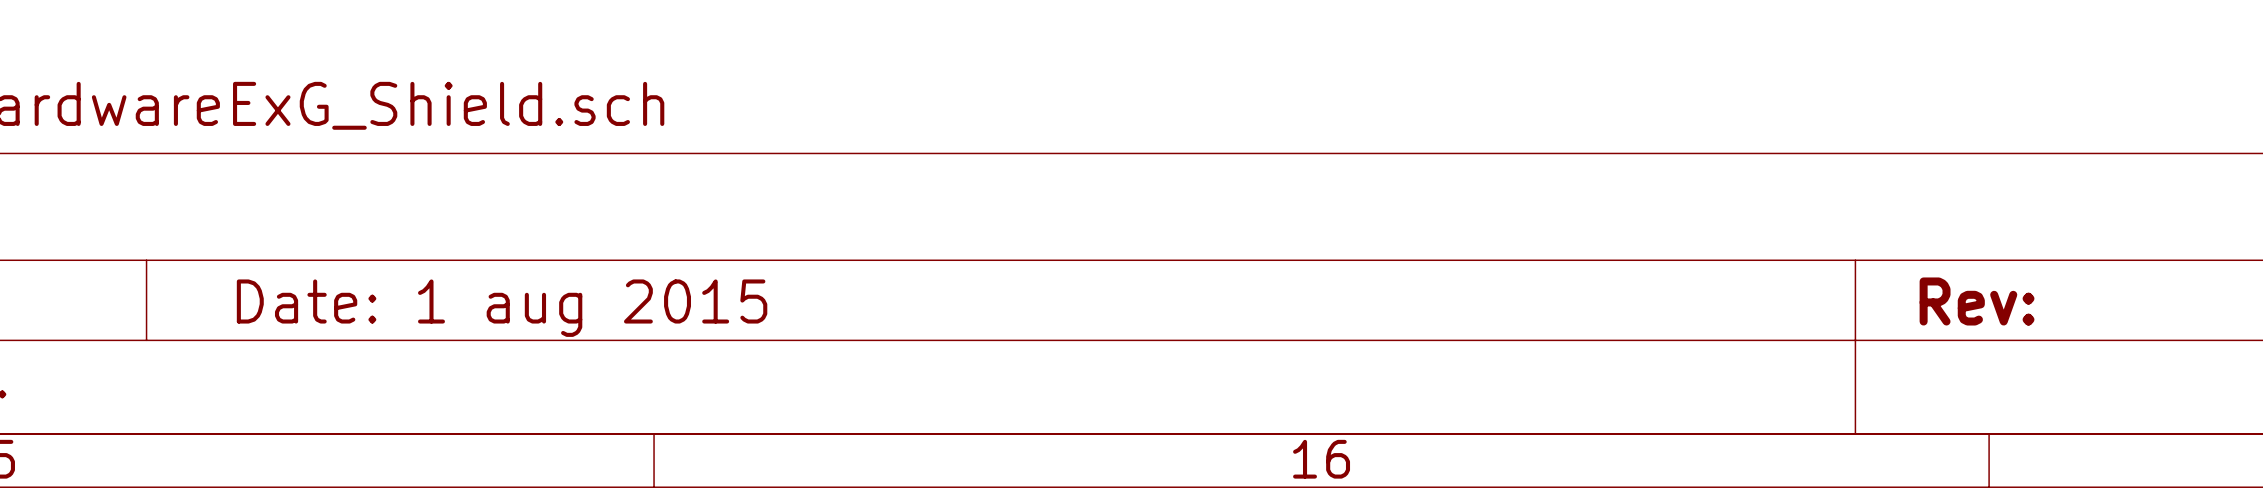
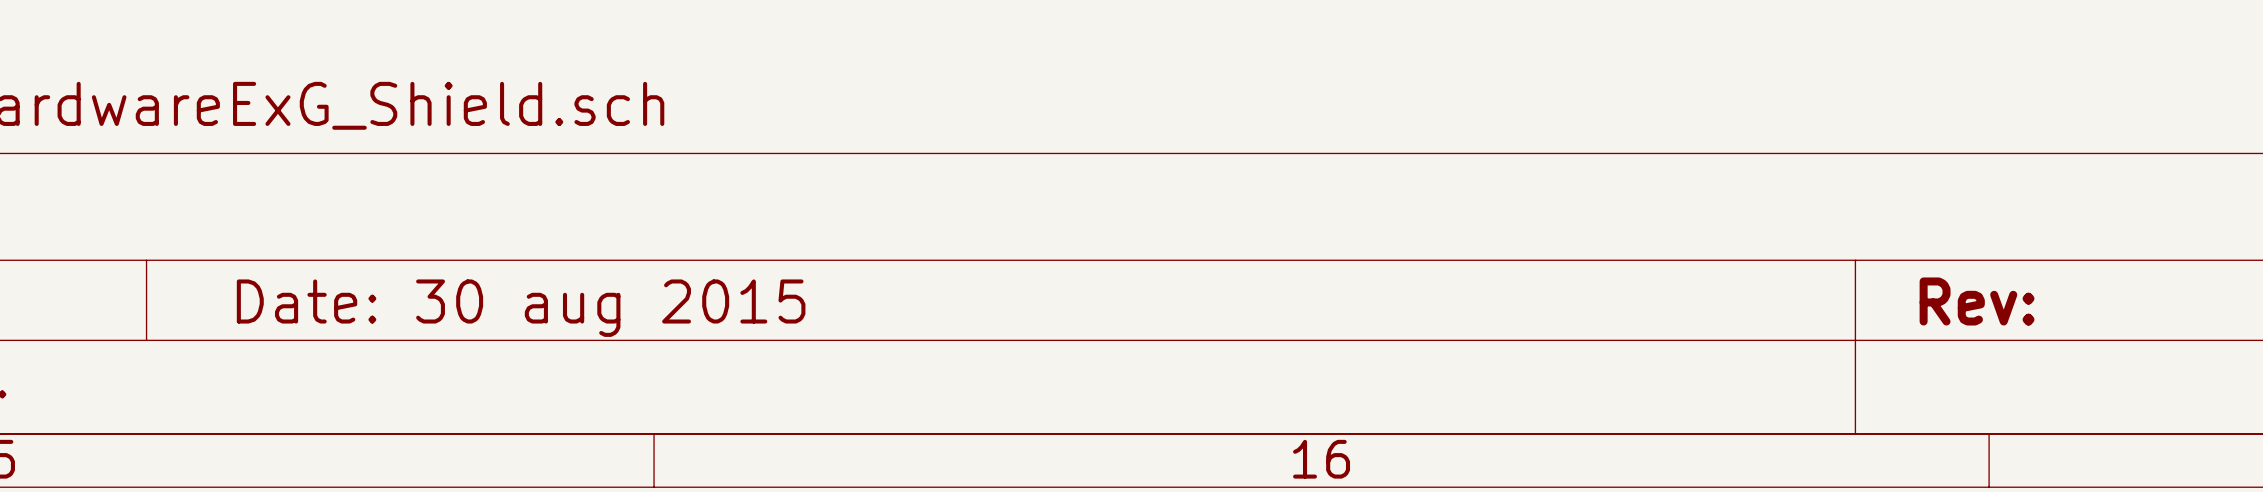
title block: Date: 1 aug 2015 (502, 308) -> Date: 30 aug 2015 (521, 308)

